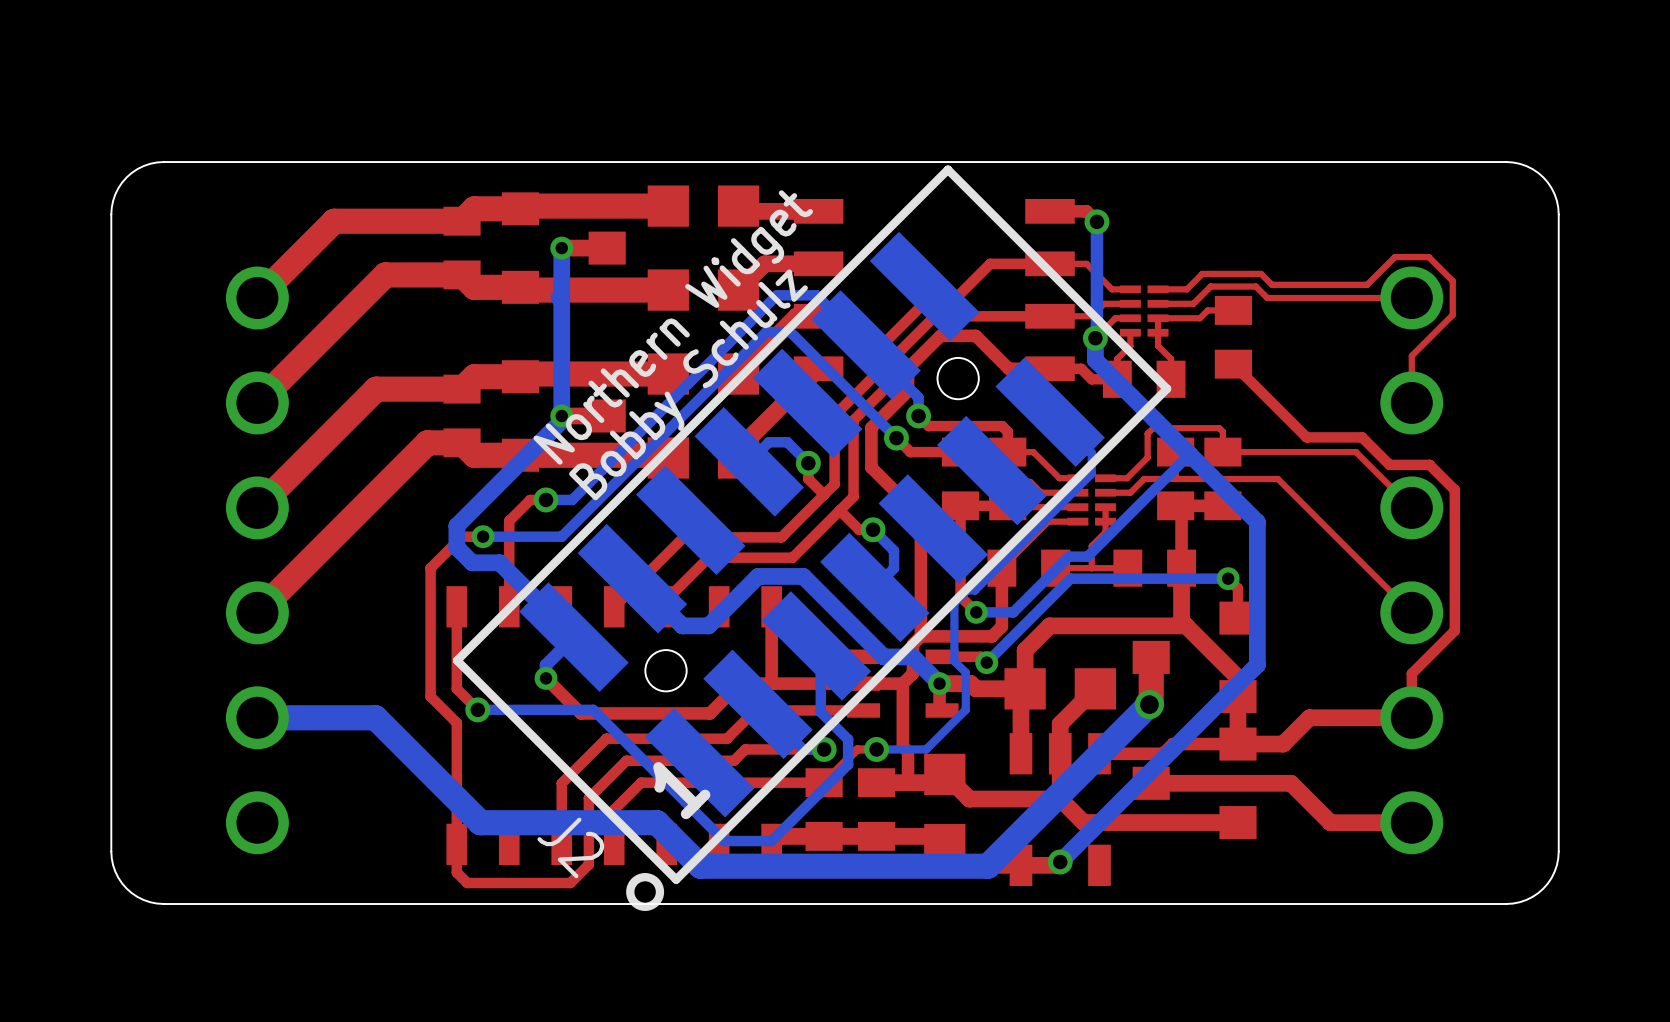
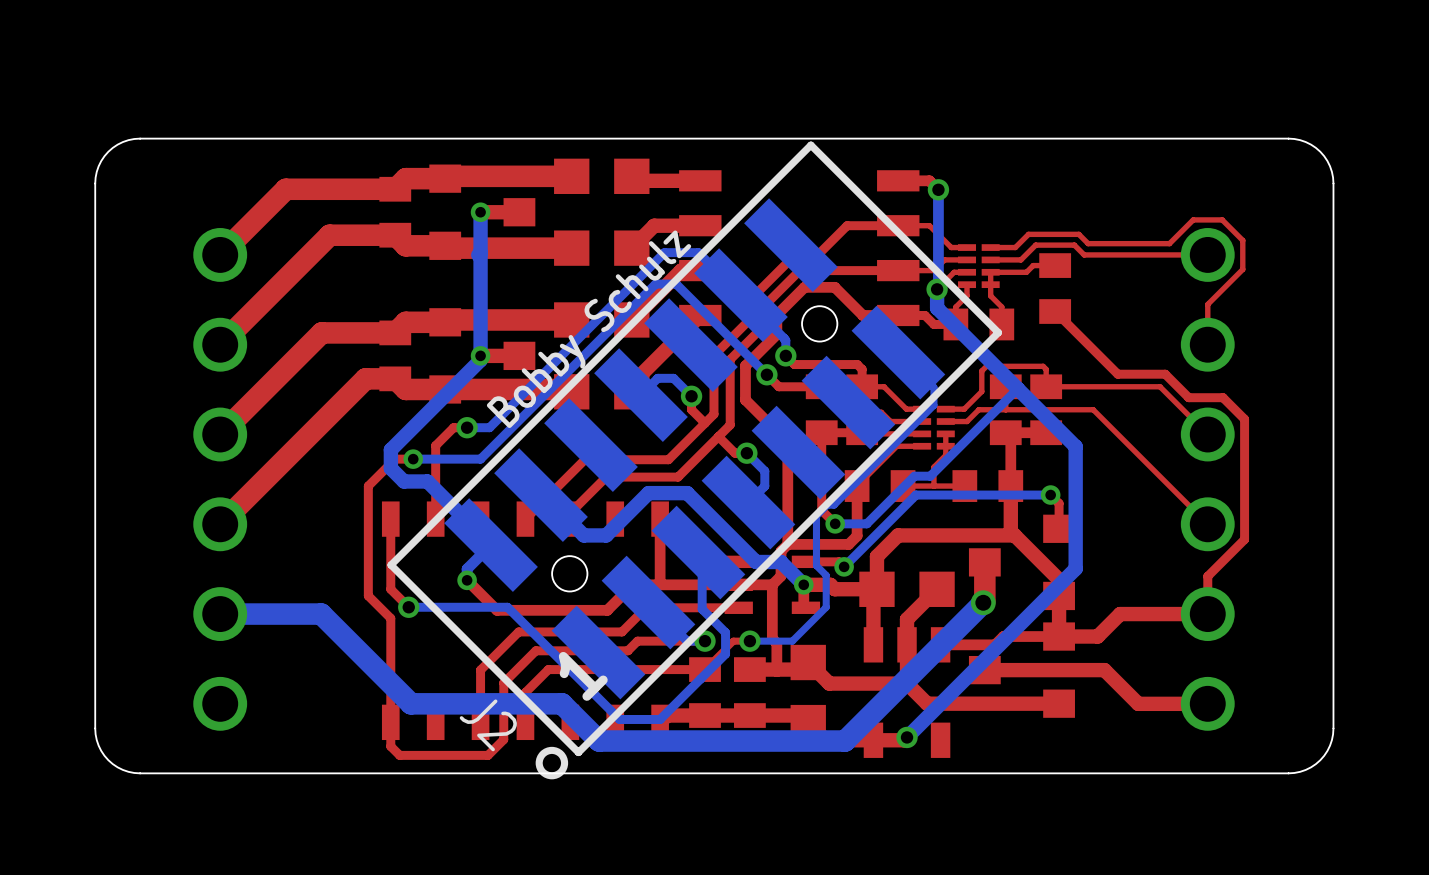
text: Northern Widget (673, 327) -> none

